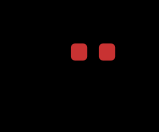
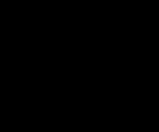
part: (93, 52) -> none

